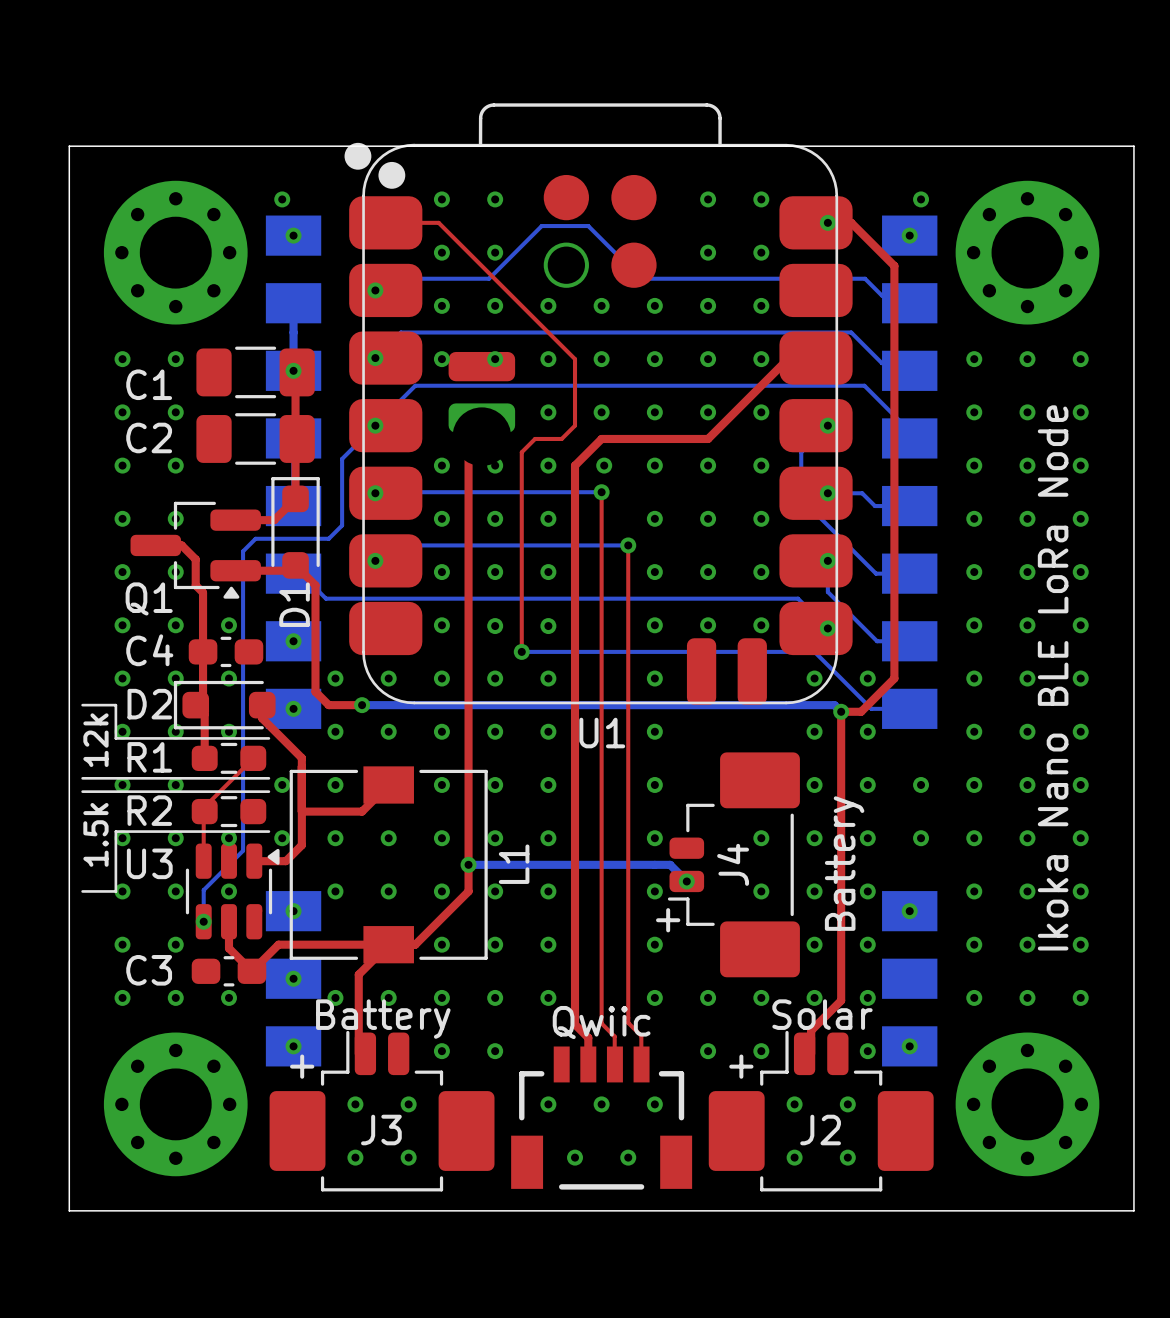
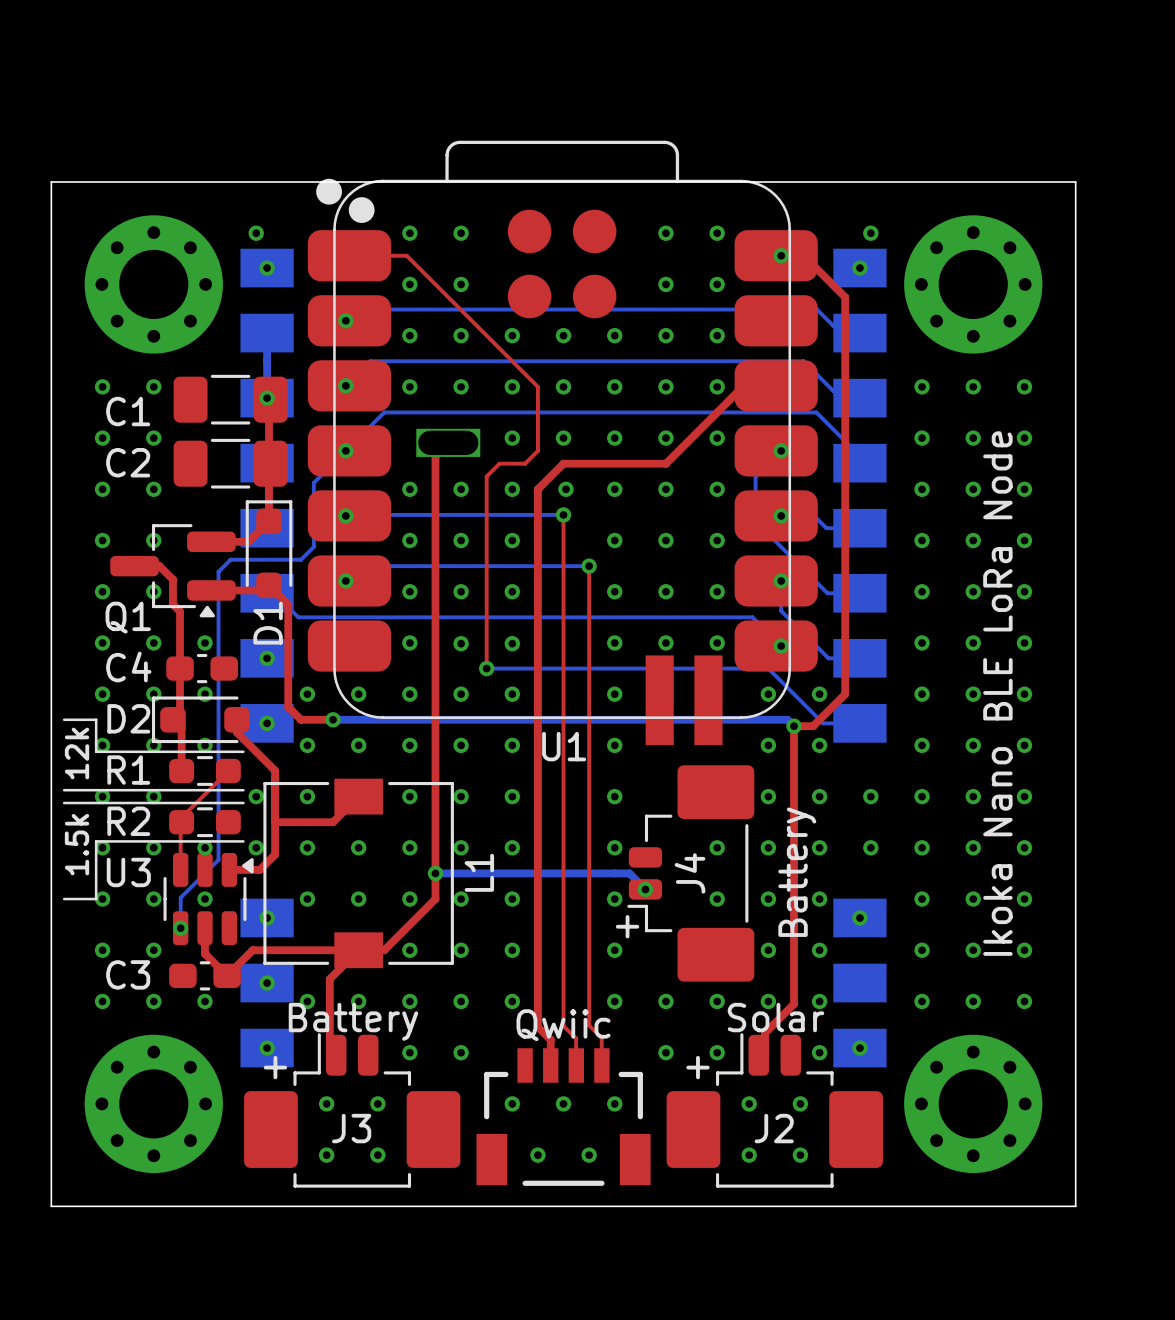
U1 footprint: [344, 103, 853, 705] -> [307, 140, 818, 746]
bottom track: (489, 278) (541, 226) (588, 226) (641, 278) -> (455, 309) (601, 309)

